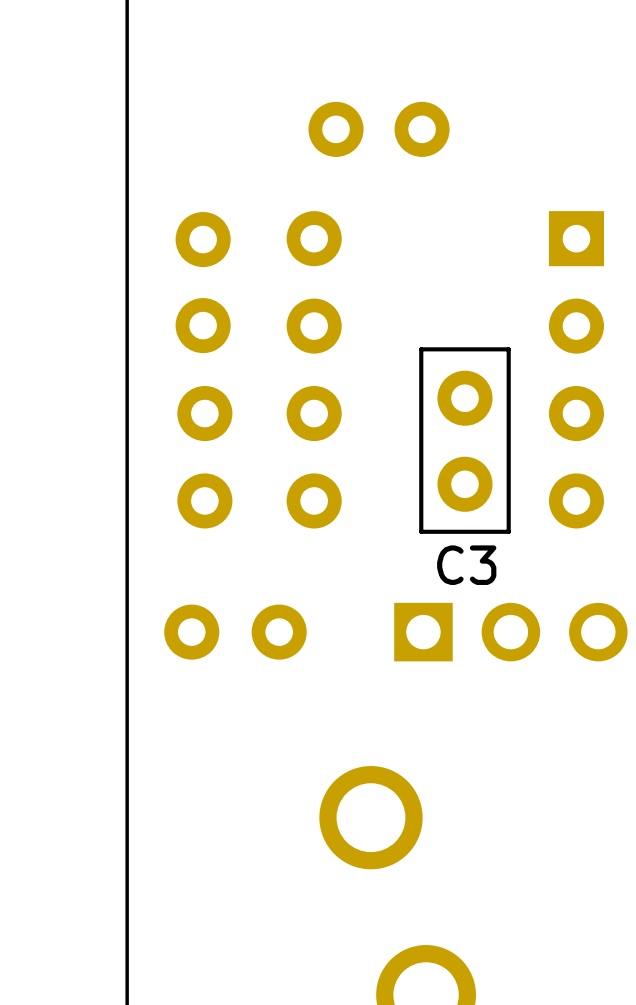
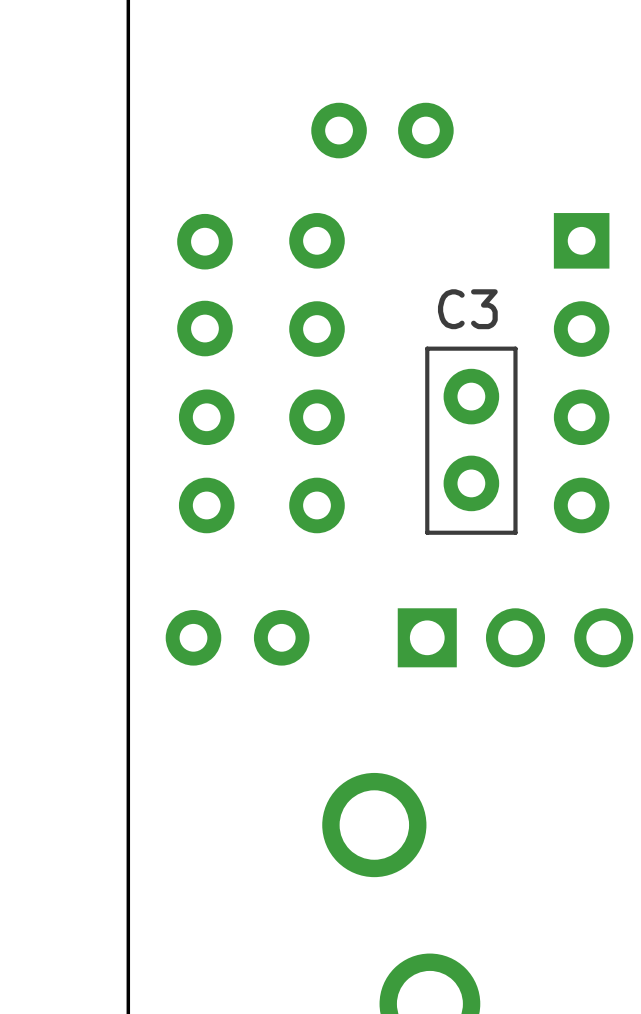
C3 rotation: 0° (464, 440) -> 180° (471, 440)

